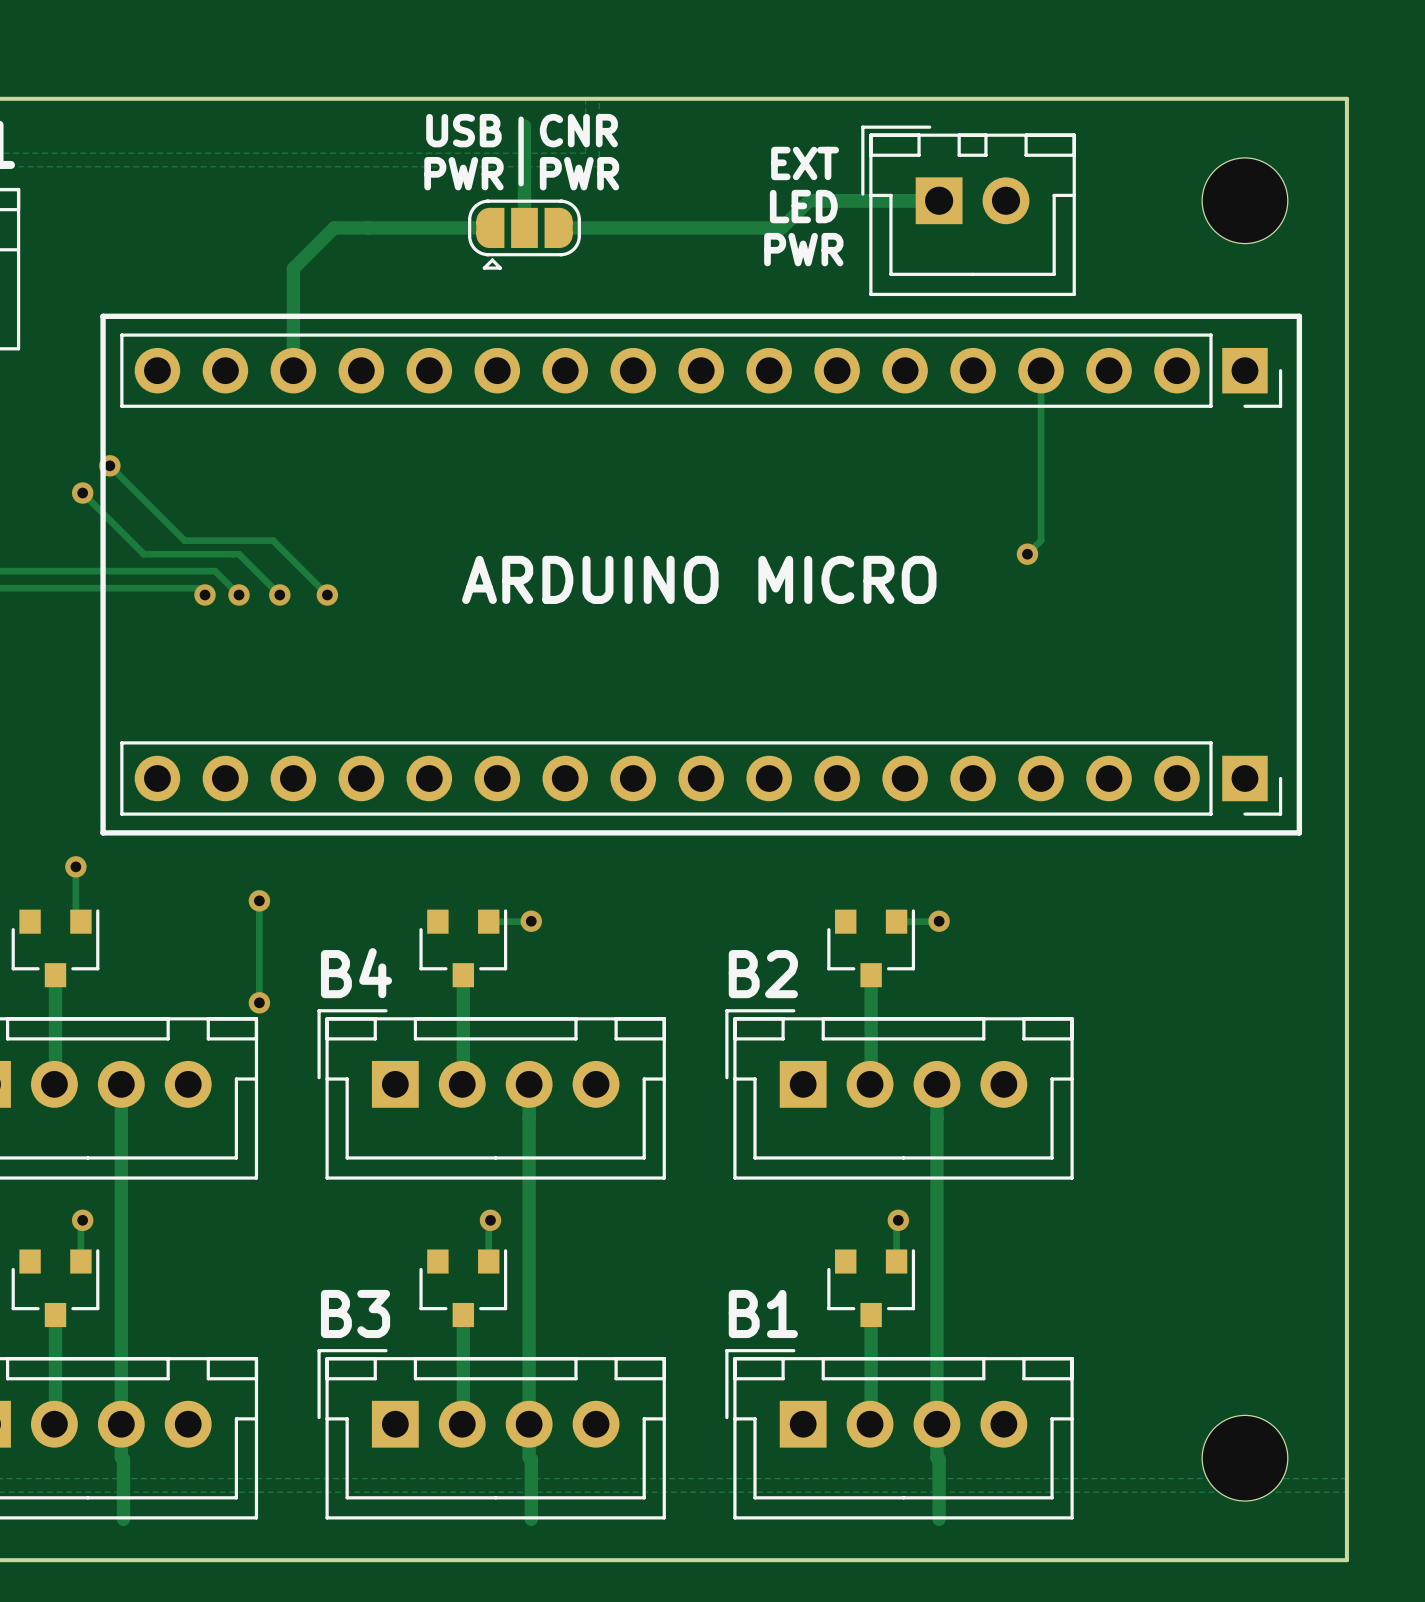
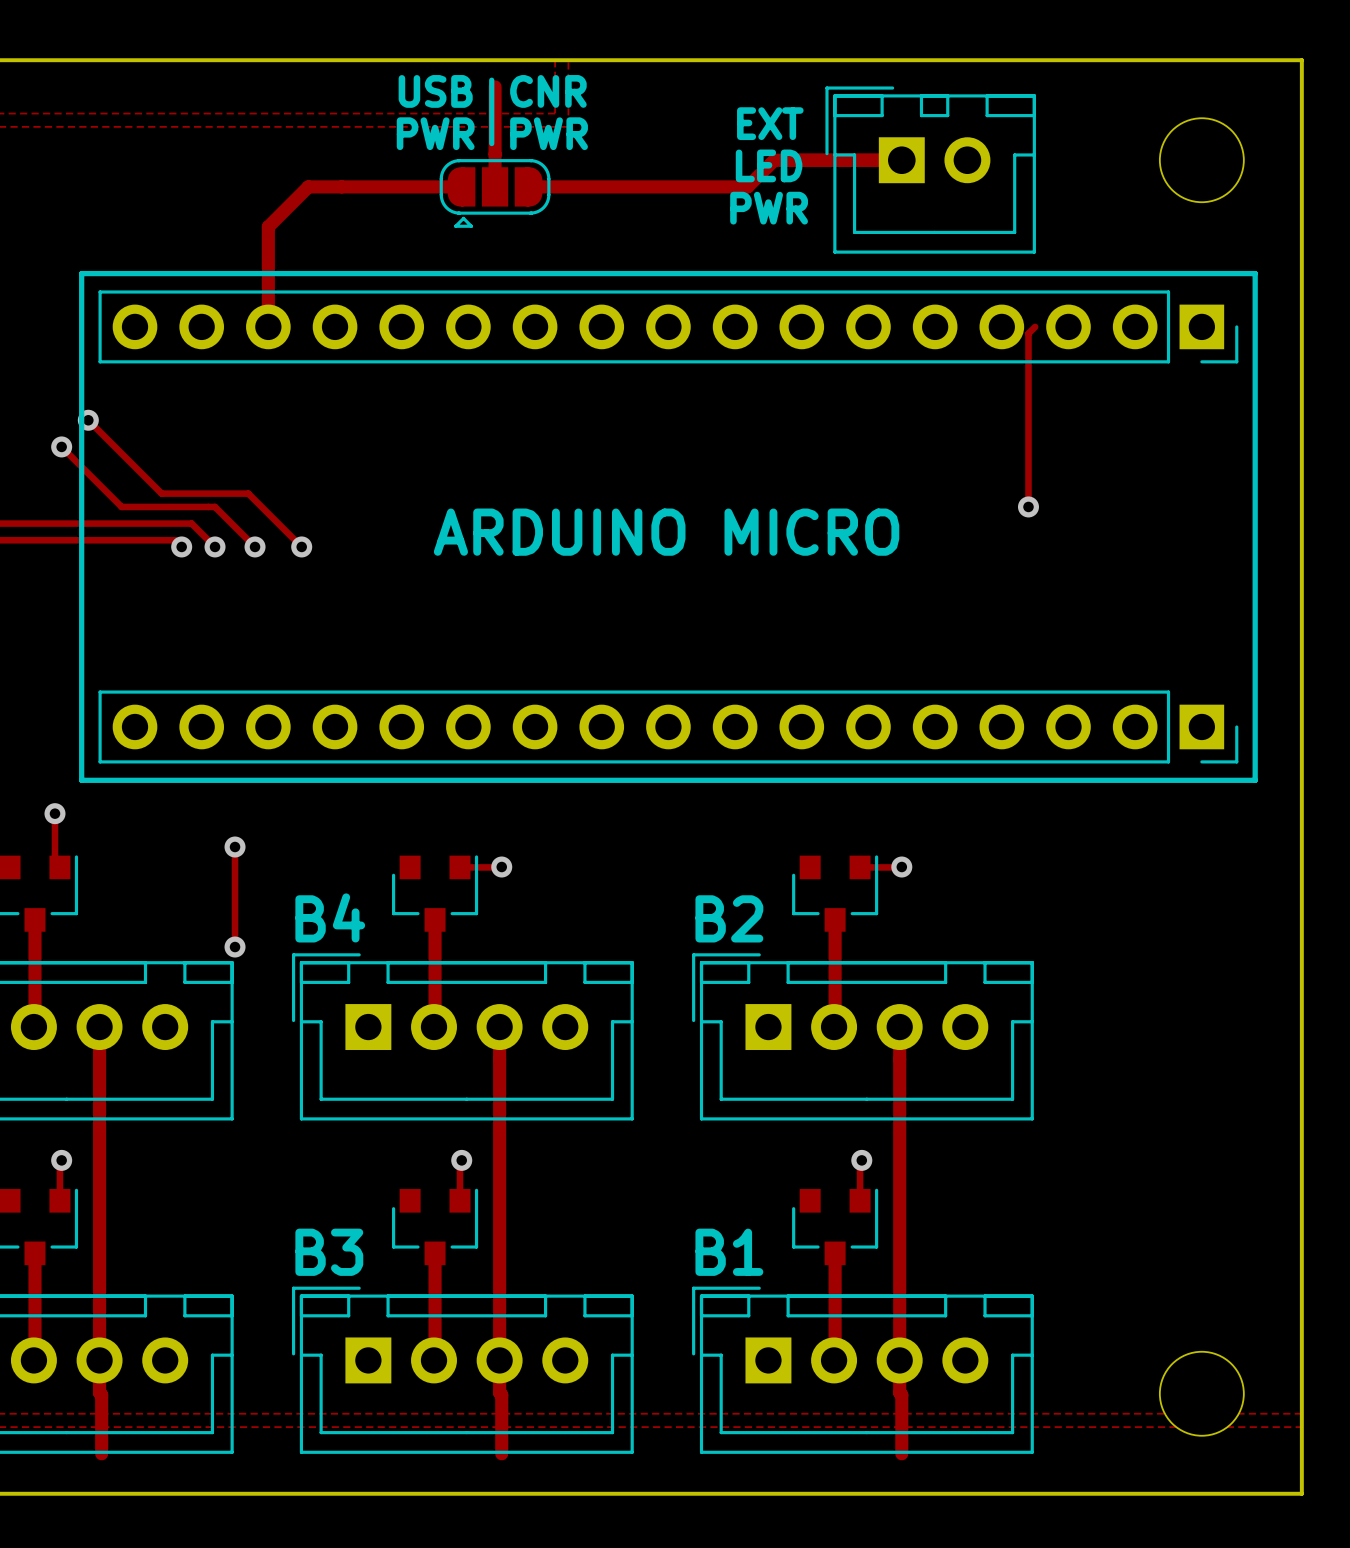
track: (1041, 370) (1041, 540) (1027, 554) -> none
track: none -> (1035, 326) (1028, 333) (1028, 506)
via position: (1027, 554) -> (1028, 506)

